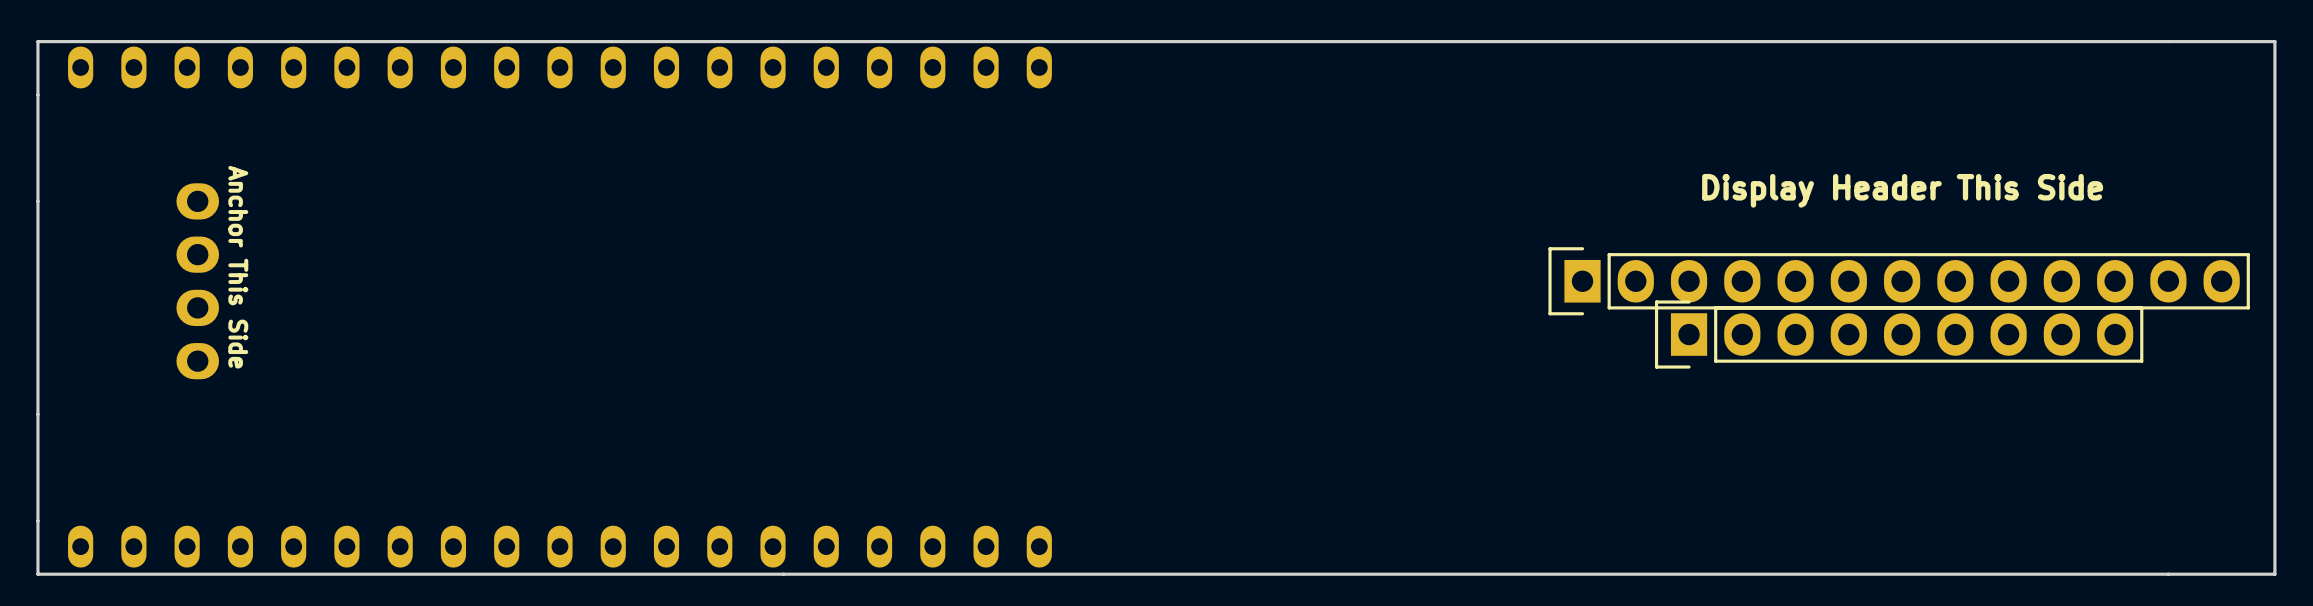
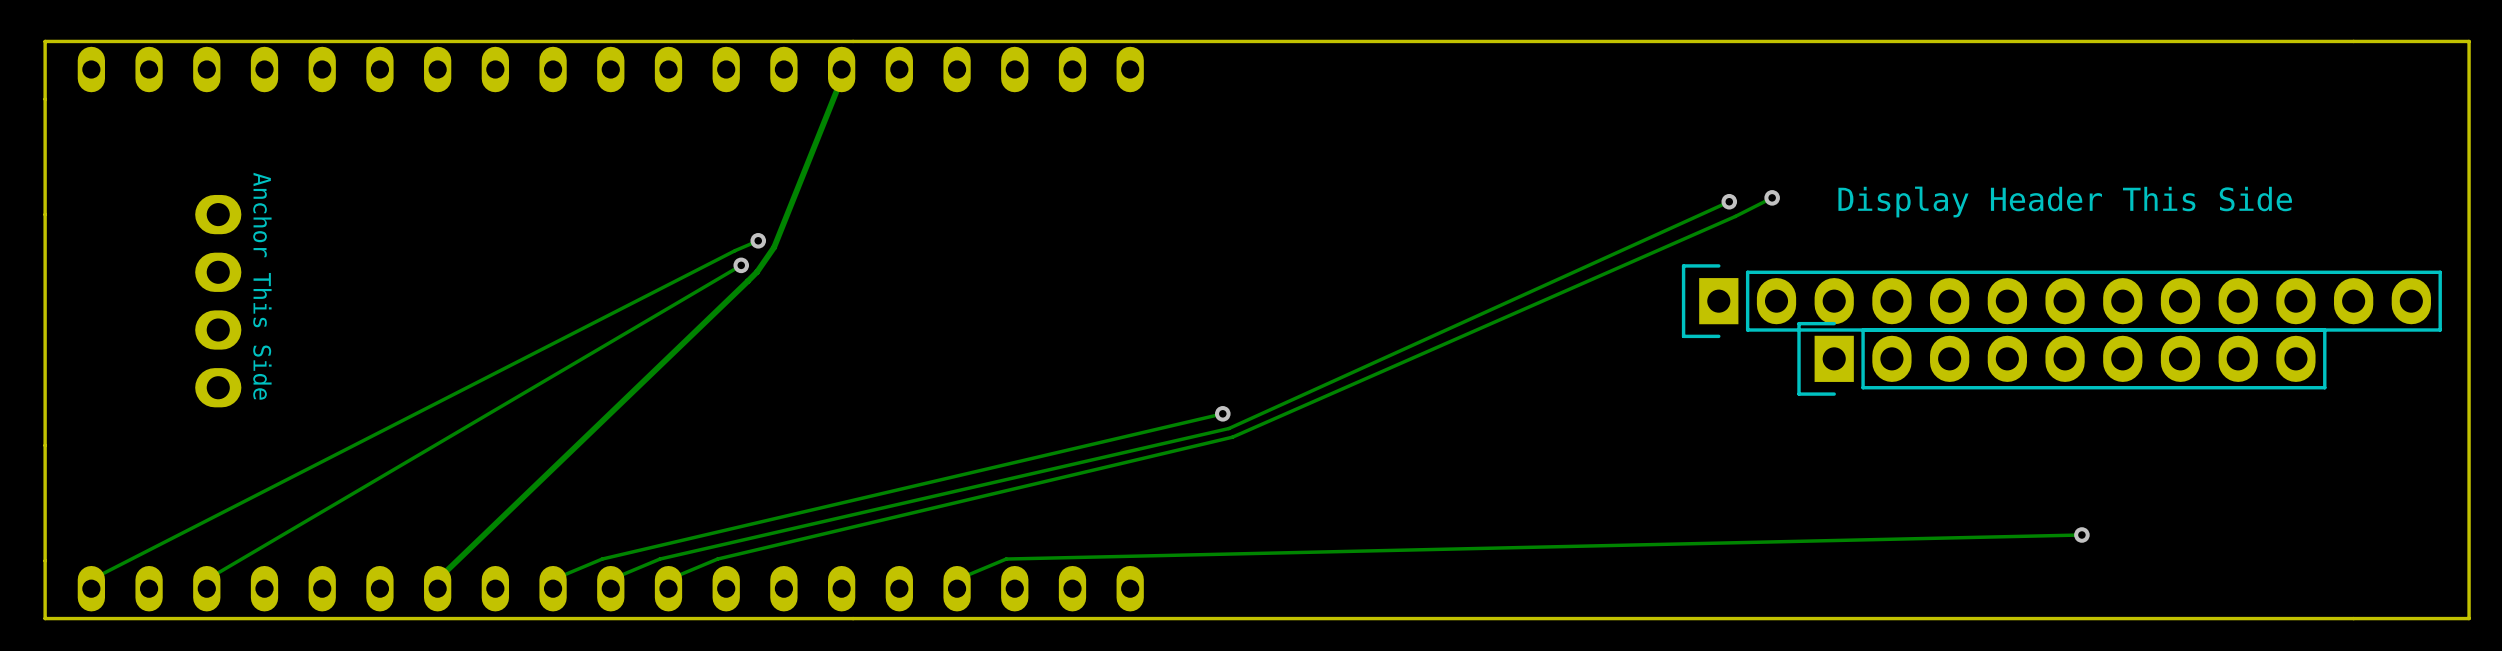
track: none -> (841, 69) (841, 78) (774, 247) (757, 271) (437, 579) (437, 588)
track: none -> (1772, 197) (1735, 216) (1232, 437) (717, 559) (668, 579) (668, 588)
via: none -> (1772, 197)
track: none -> (1729, 201) (1228, 428) (659, 559) (610, 579) (610, 588)
via: none -> (1729, 201)
track: none -> (758, 240) (735, 250) (91, 579) (91, 588)
via: none -> (758, 240)
track: none -> (741, 265) (206, 579) (206, 588)
via: none -> (741, 265)
track: none -> (1222, 413) (602, 559) (553, 579) (553, 588)
via: none -> (1222, 413)
track: none -> (2081, 534) (1006, 559) (957, 579) (957, 588)
via: none -> (2081, 534)

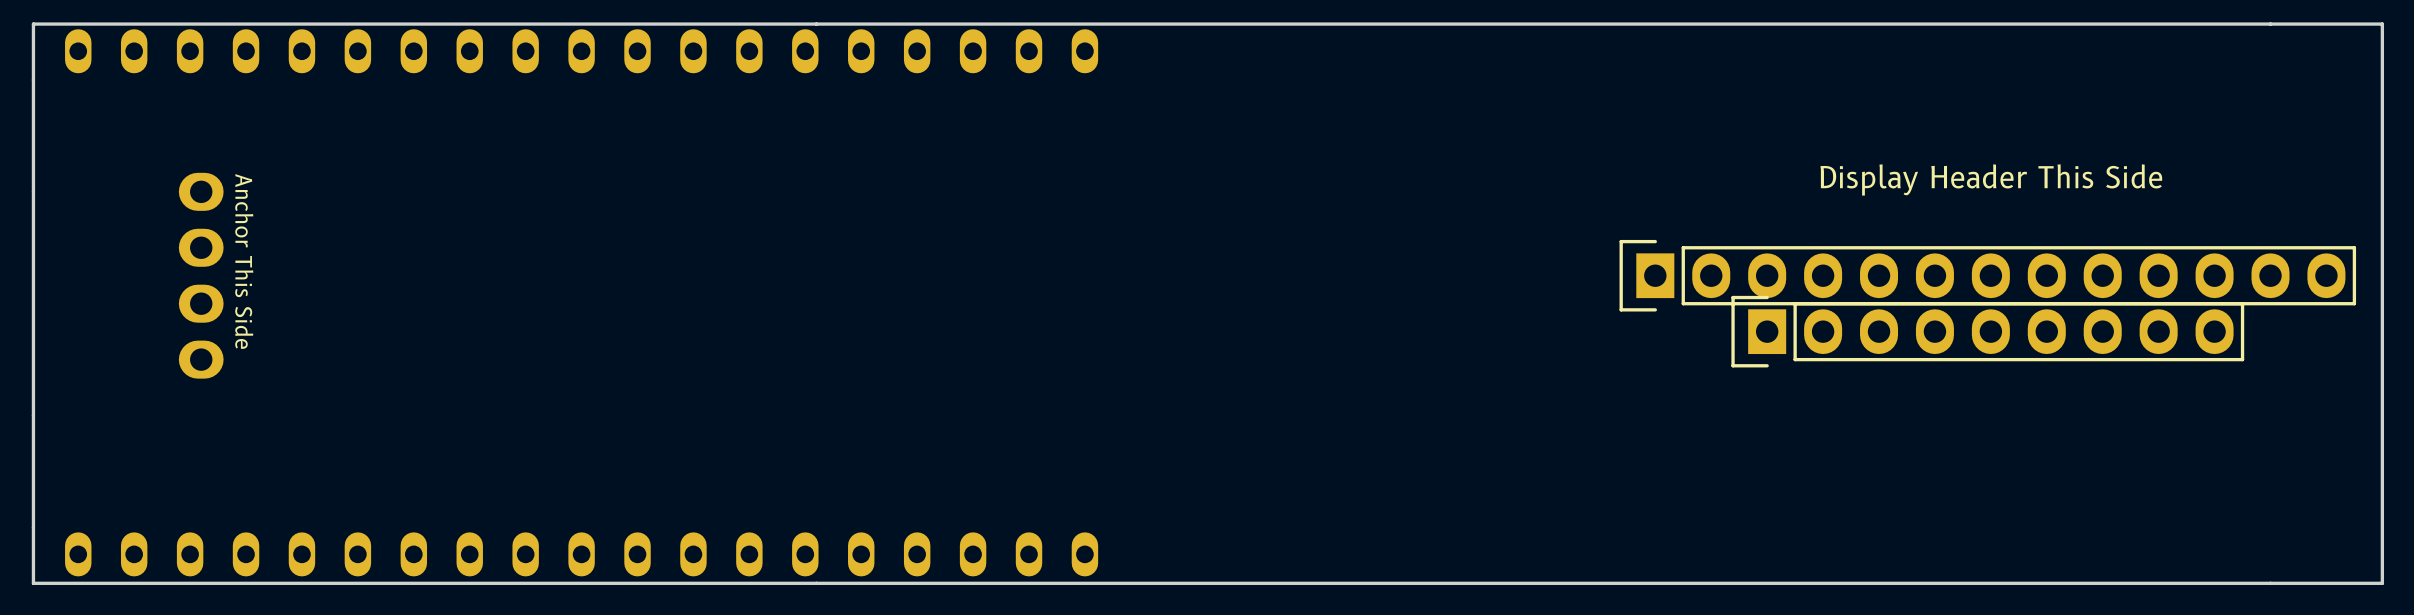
track: (841, 69) (841, 78) (774, 247) (757, 271) (437, 579) (437, 588) -> none
track: (1772, 197) (1735, 216) (1232, 437) (717, 559) (668, 579) (668, 588) -> none
via: (1772, 197) -> none
track: (1729, 201) (1228, 428) (659, 559) (610, 579) (610, 588) -> none
via: (1729, 201) -> none
track: (758, 240) (735, 250) (91, 579) (91, 588) -> none
via: (758, 240) -> none
track: (741, 265) (206, 579) (206, 588) -> none
via: (741, 265) -> none
track: (1222, 413) (602, 559) (553, 579) (553, 588) -> none
via: (1222, 413) -> none
track: (2081, 534) (1006, 559) (957, 579) (957, 588) -> none
via: (2081, 534) -> none

